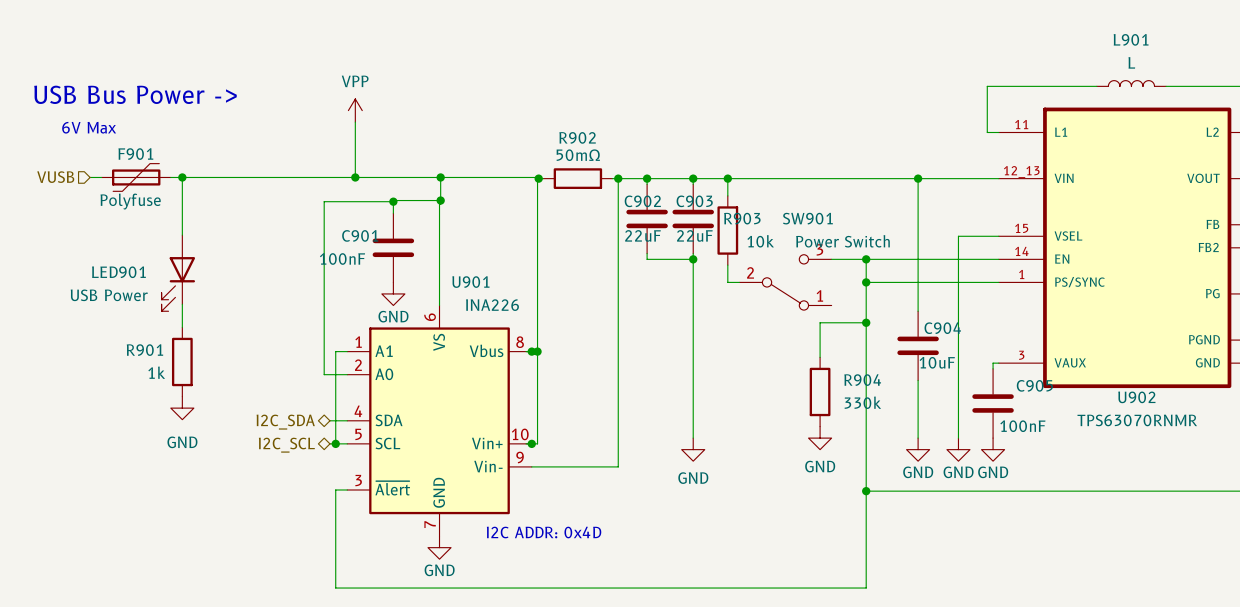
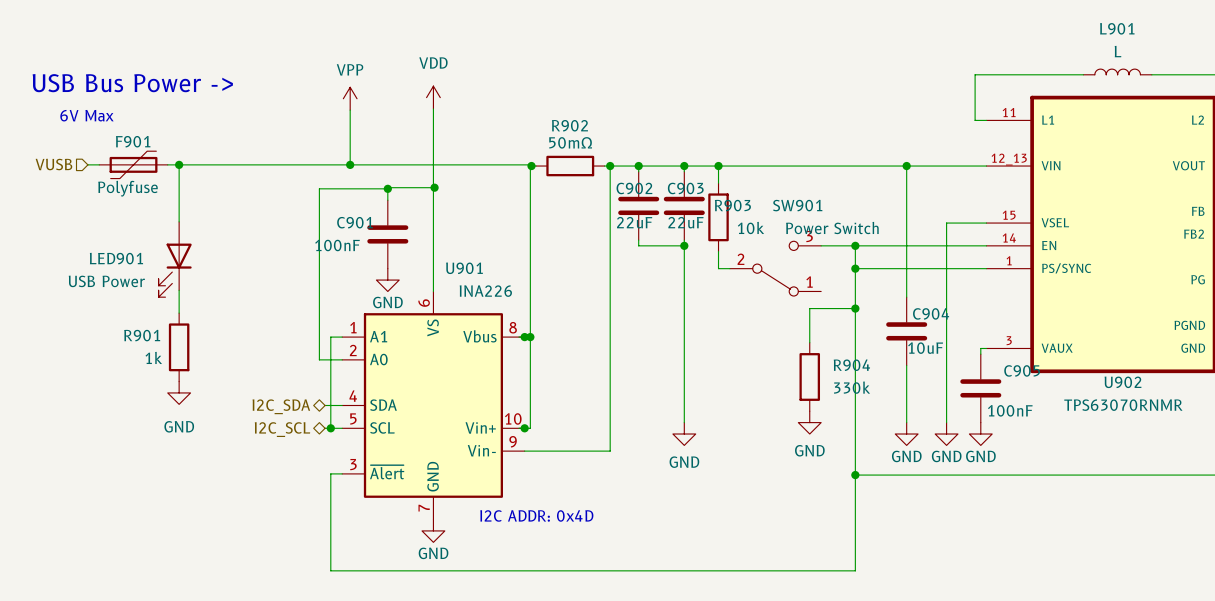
power symbol: none -> VDD (433, 97)
wire: (440, 177) (439, 204) -> (433, 109) (433, 191)
junction: (440, 177) -> none

